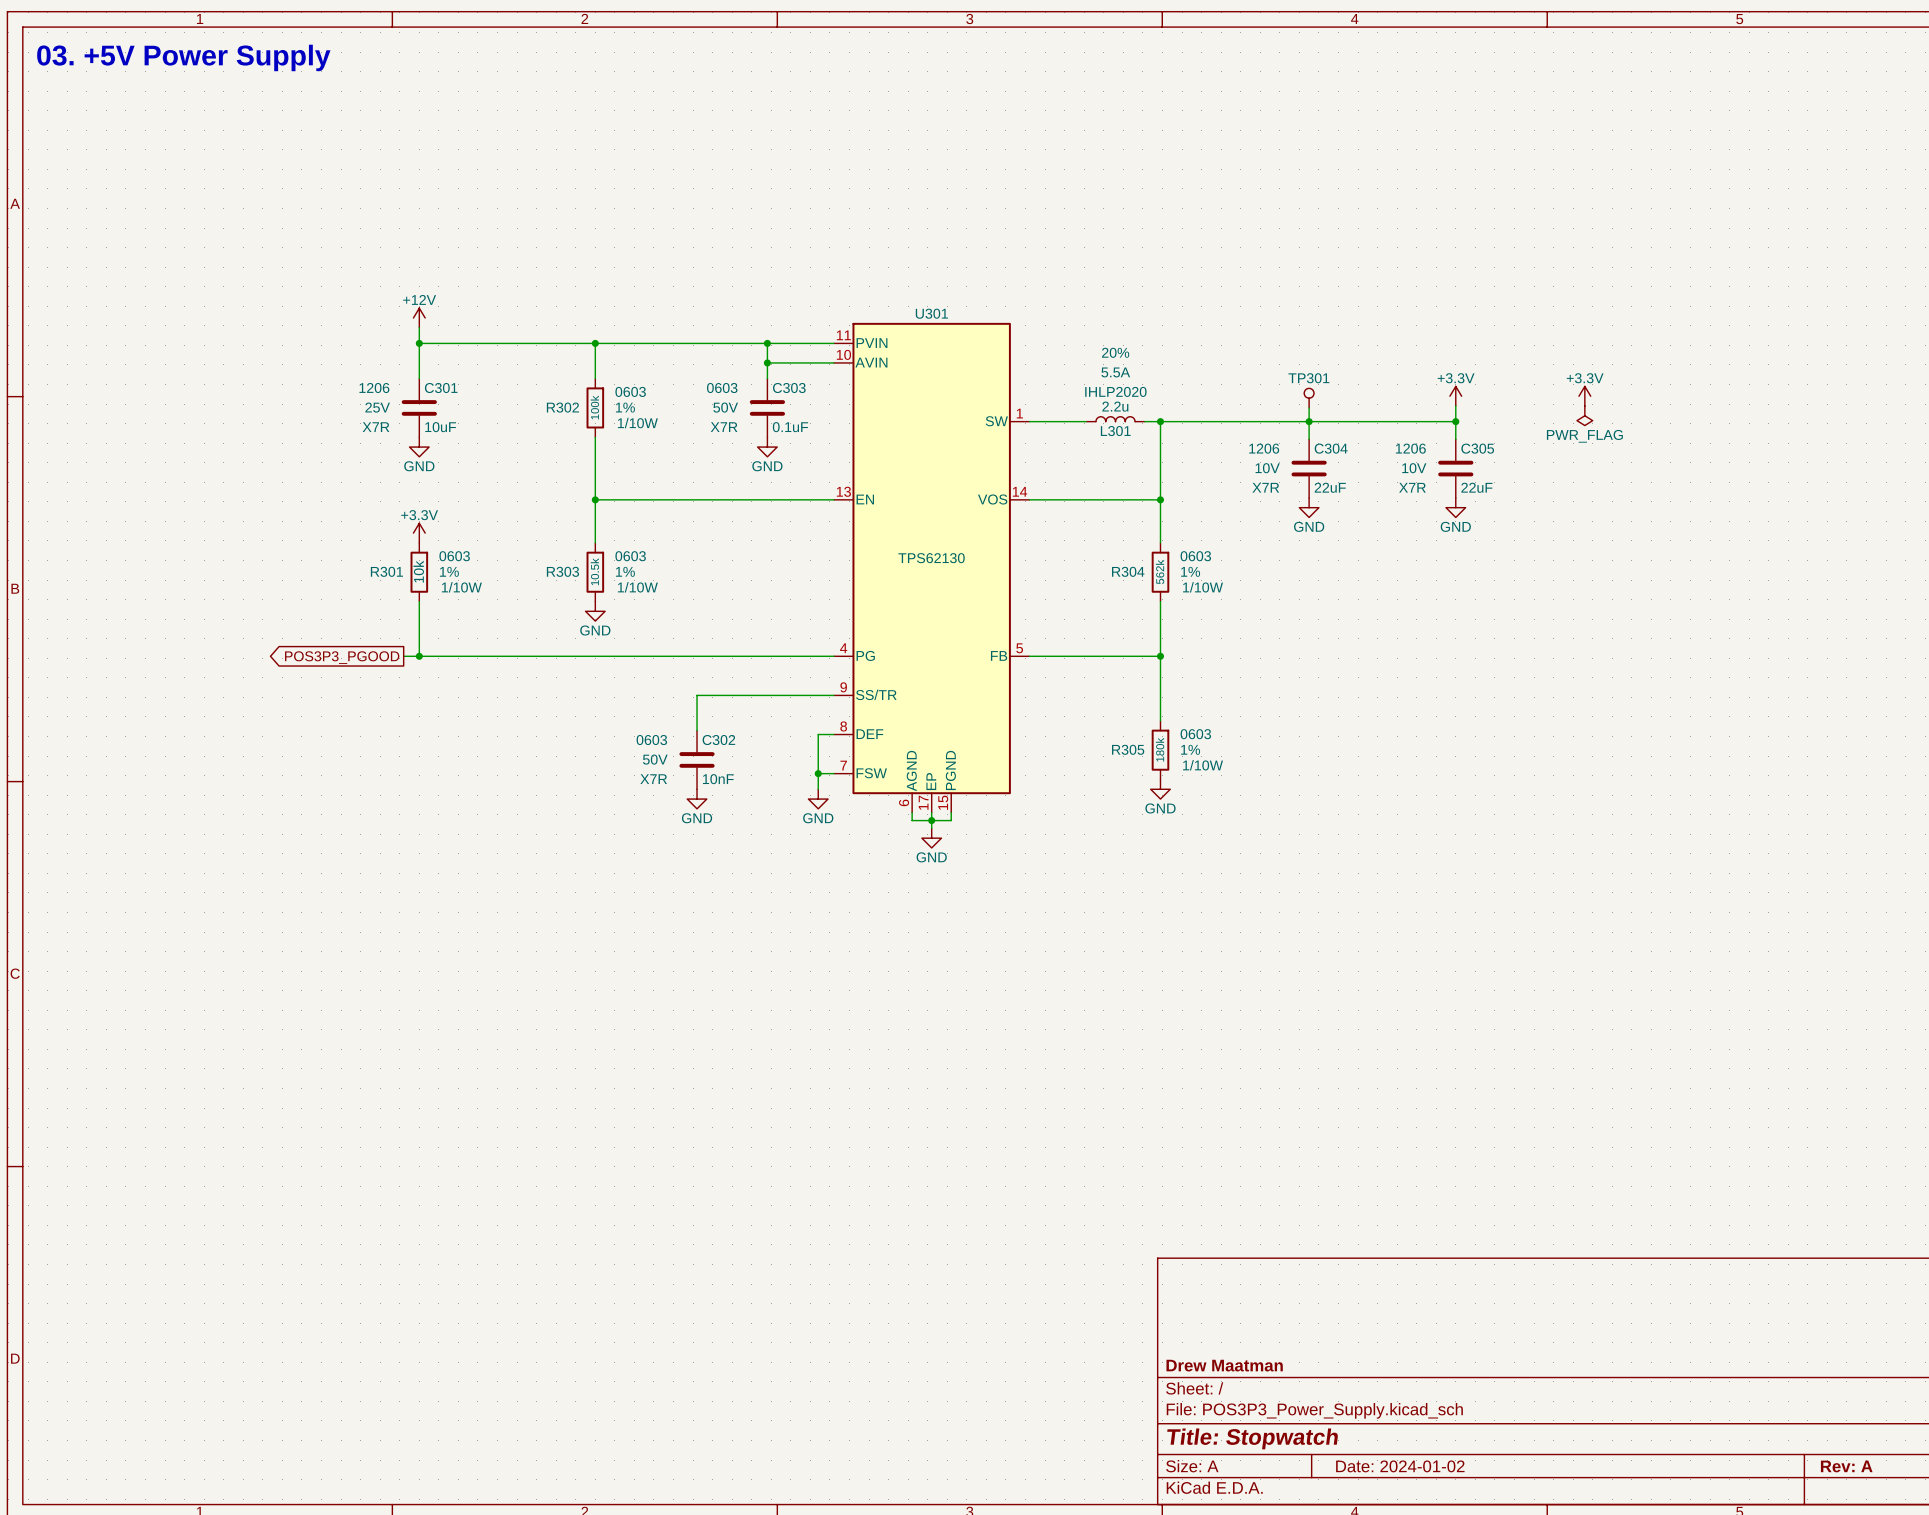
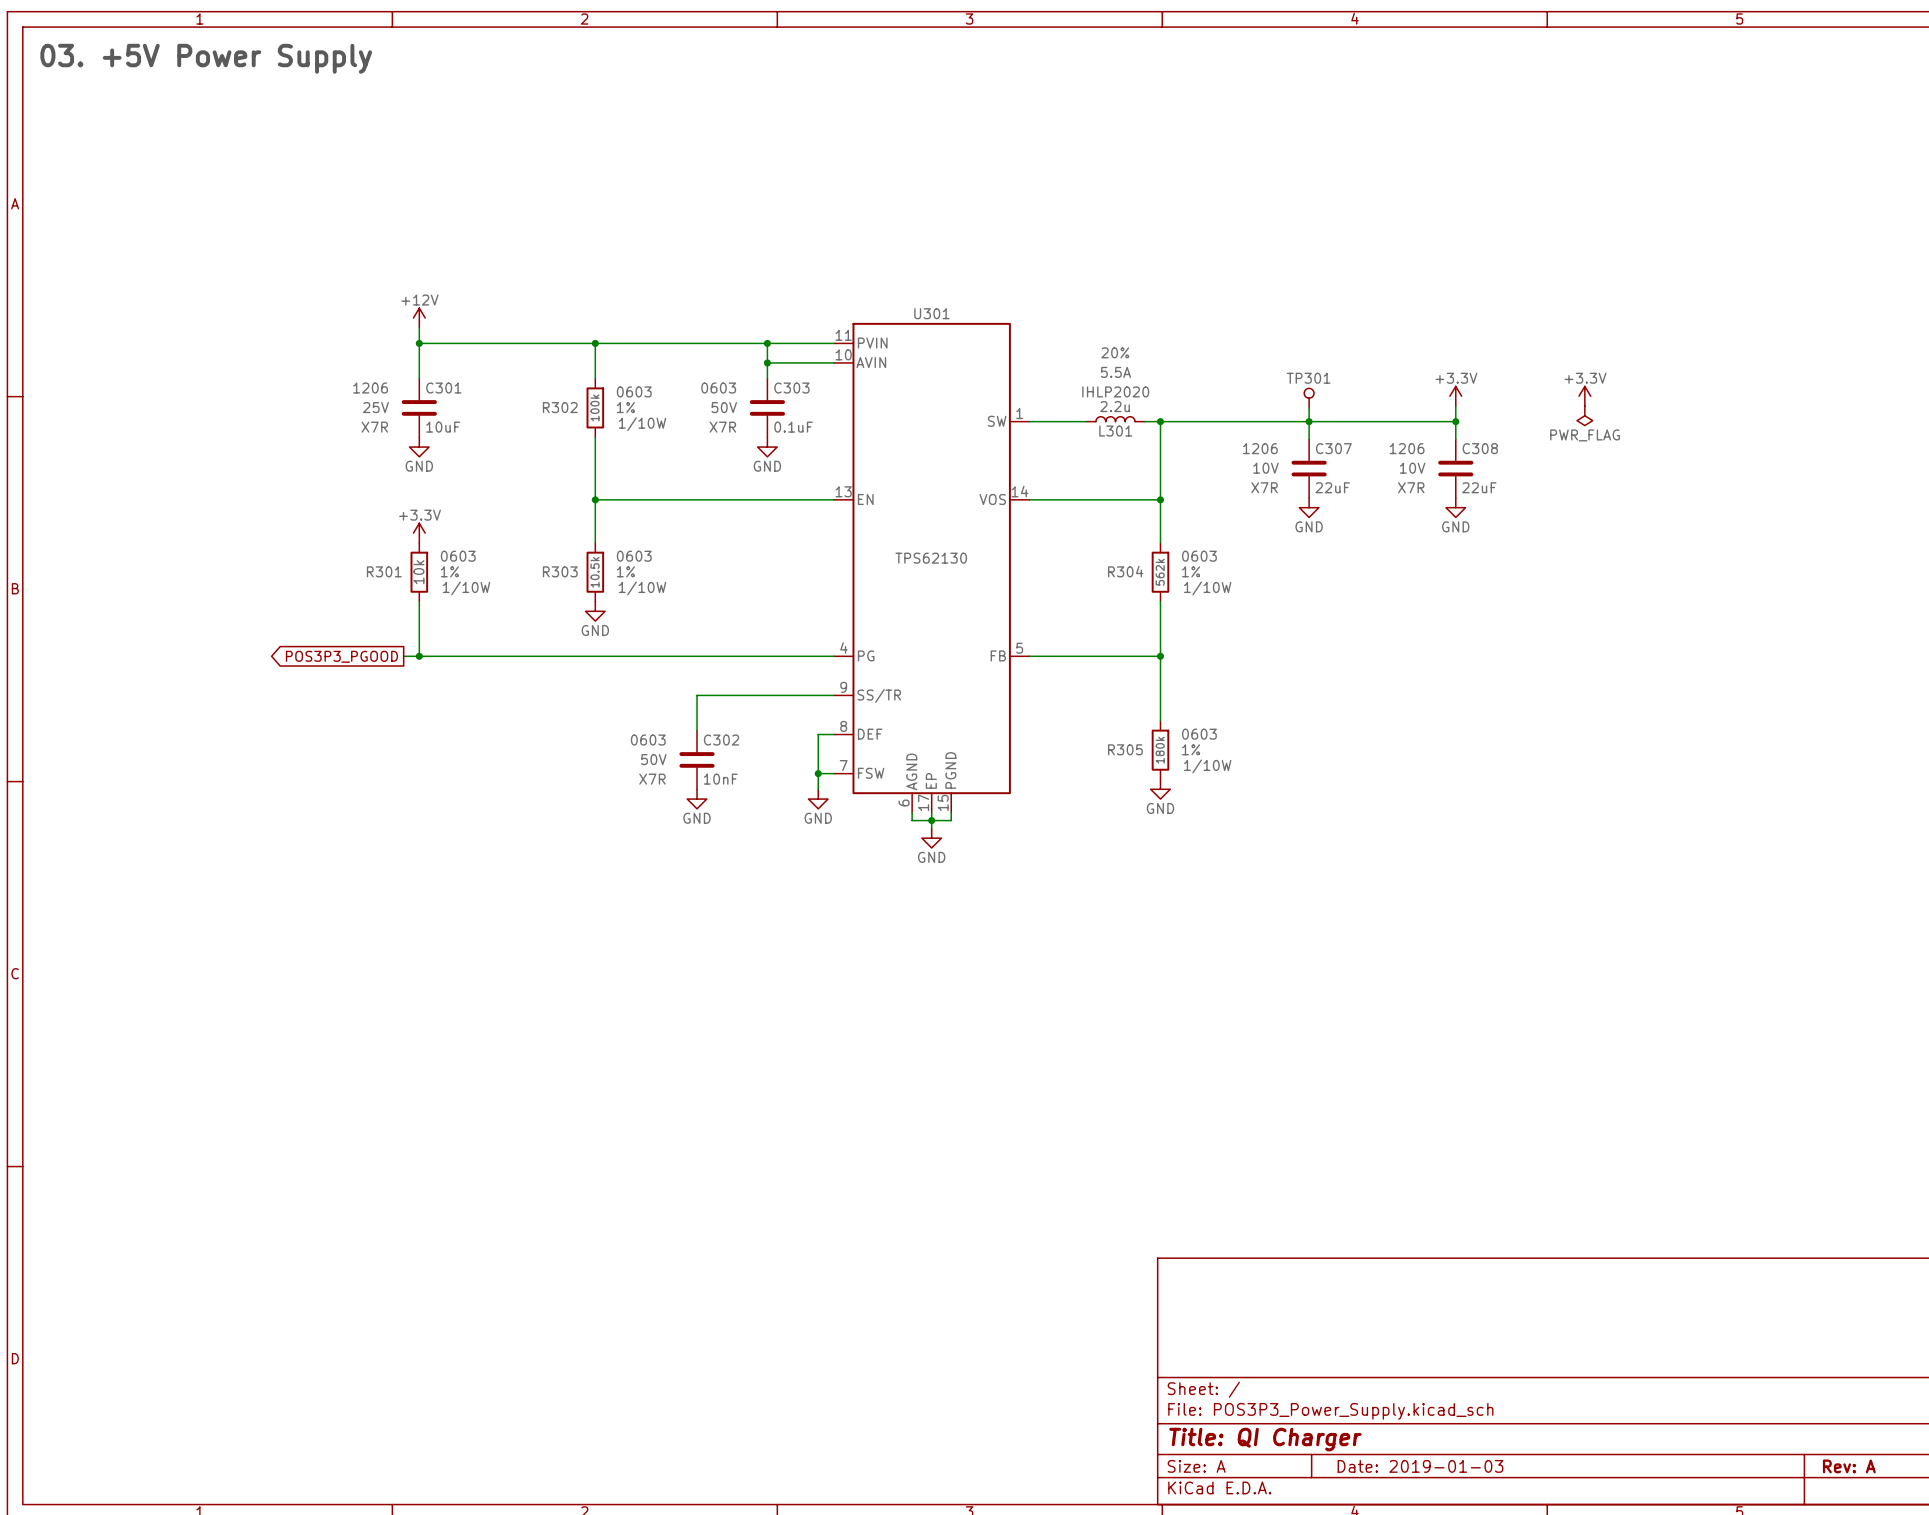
C304 name: C304 (1331, 448) -> C307 (1333, 448)
C305 name: C305 (1477, 448) -> C308 (1480, 448)
title block: Drew Maatman (1224, 1365) -> none
title block: Title: Stopwatch (1252, 1438) -> Title: QI Charger (1265, 1439)
title block: Date: 2024-01-02 (1400, 1466) -> Date: 2019-01-03 (1420, 1466)

